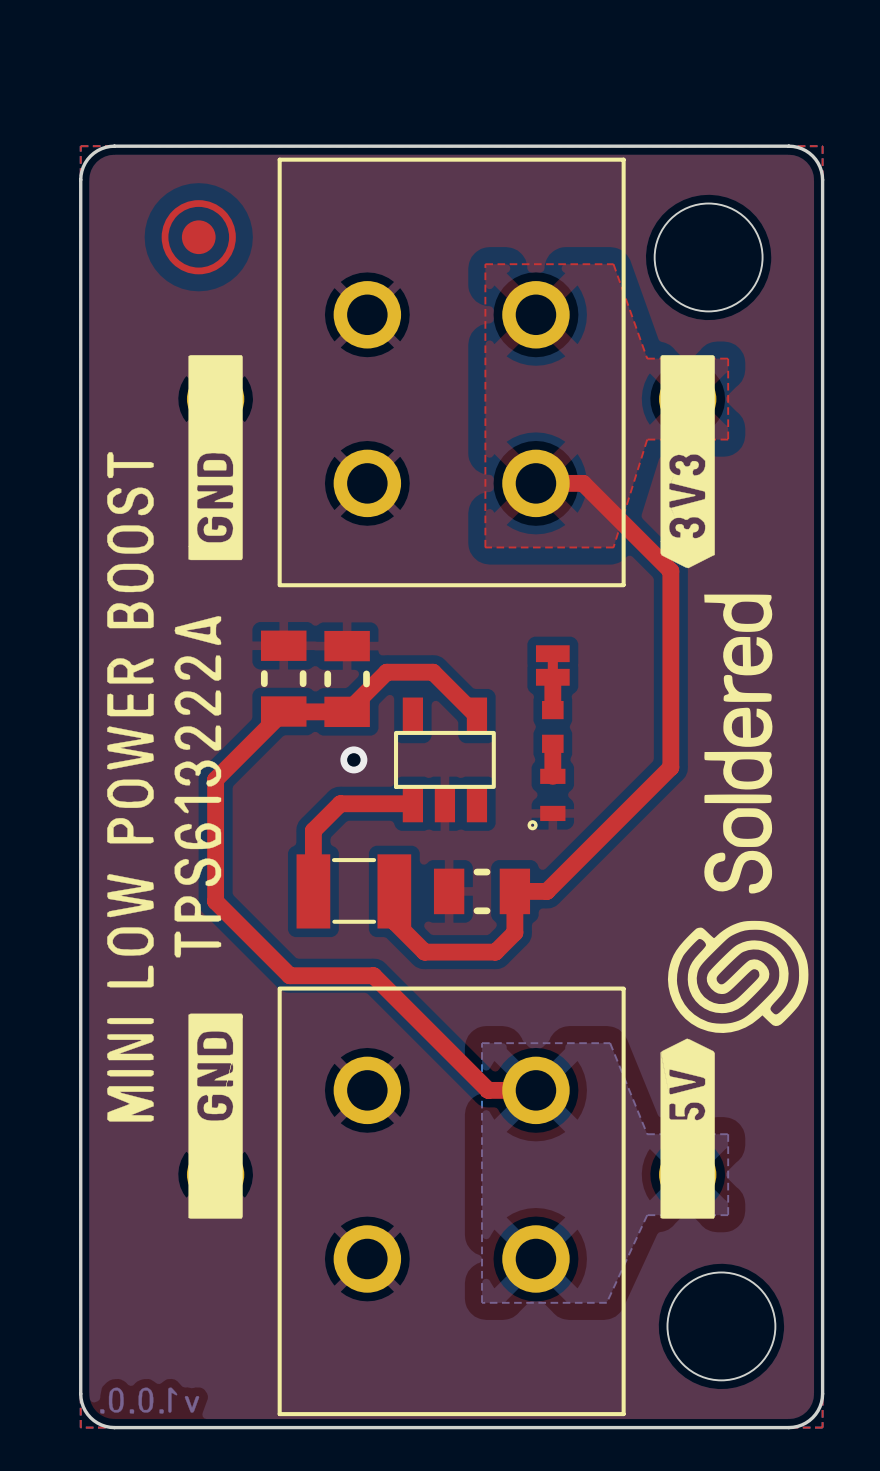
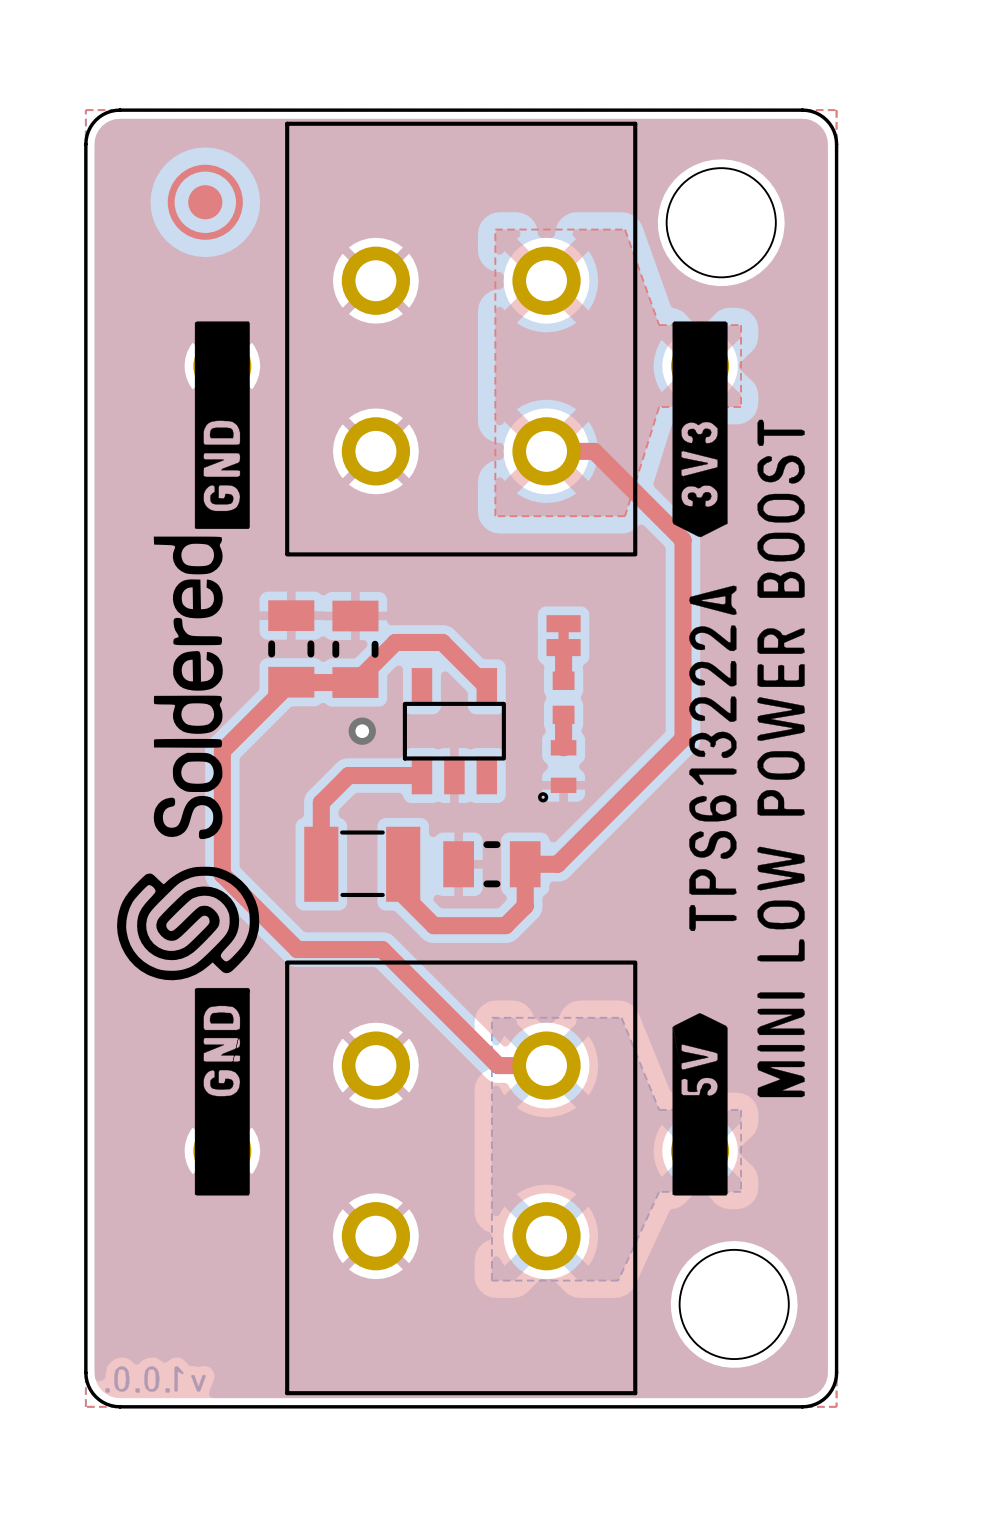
drawing position: (130, 786) -> (781, 758)
drawing position: (197, 786) -> (712, 758)
drawing position: (738, 813) -> (188, 758)

